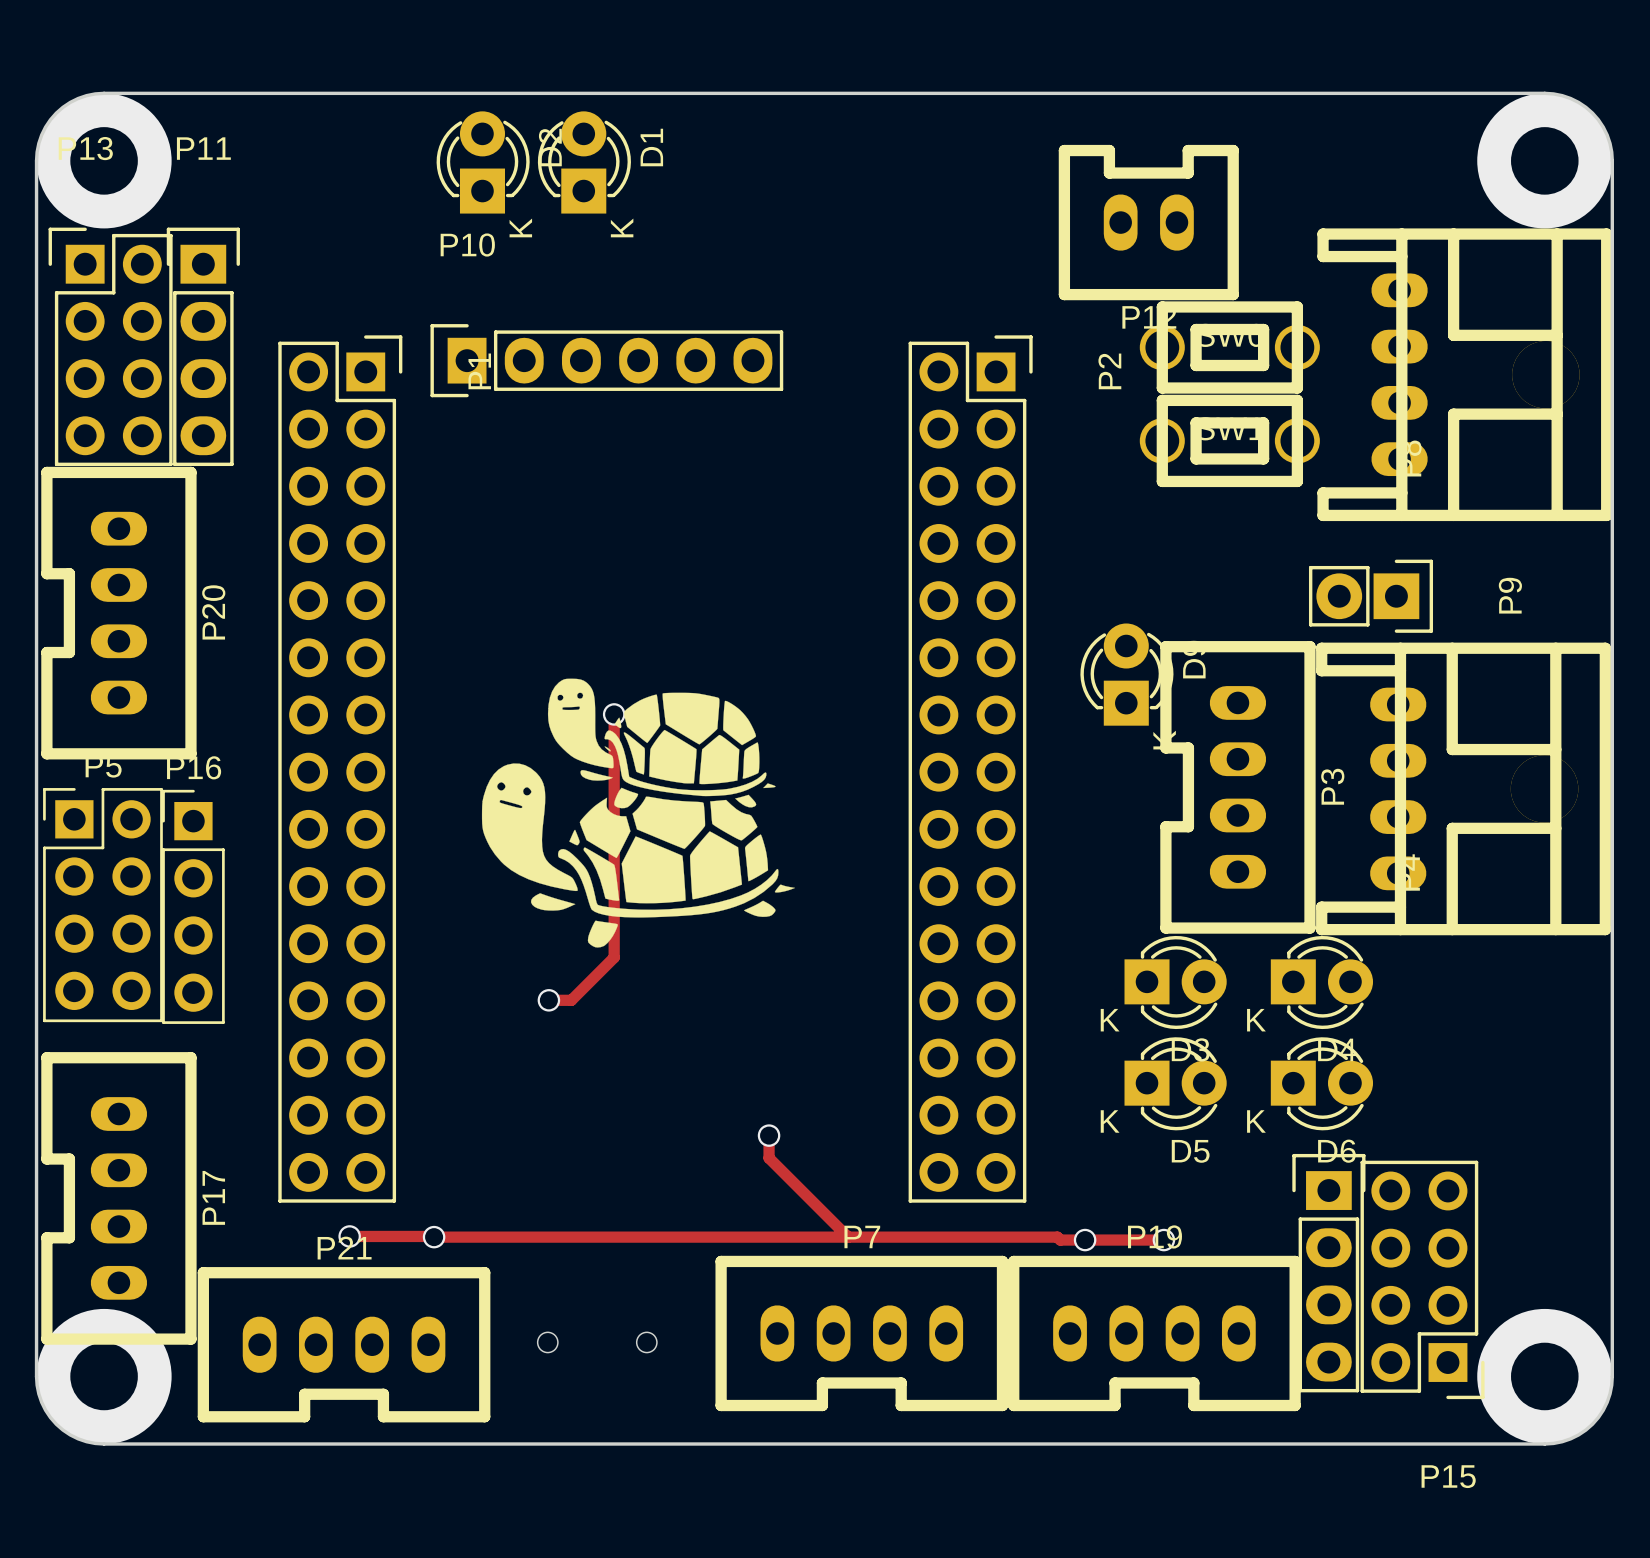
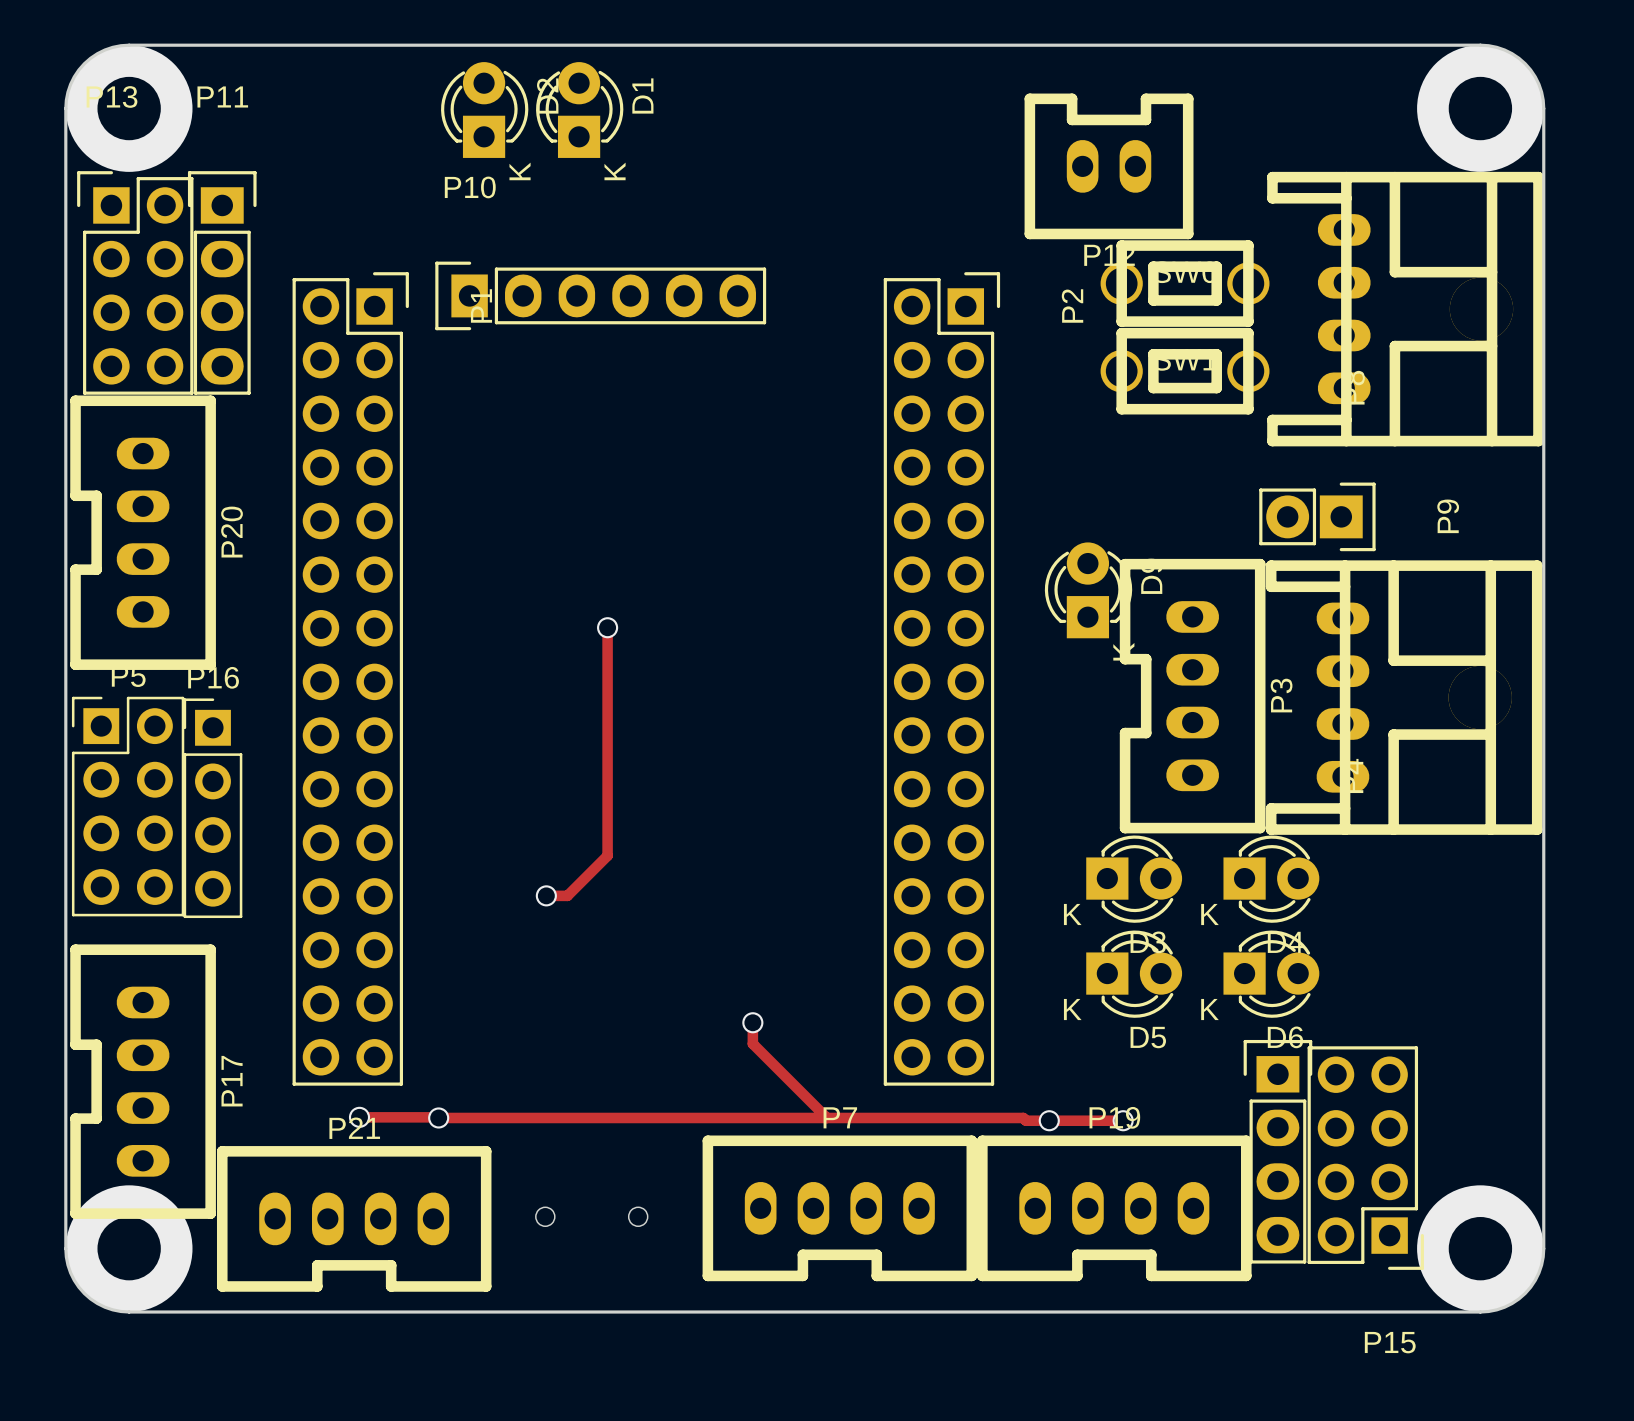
drawing: [481, 678, 796, 948] -> none

